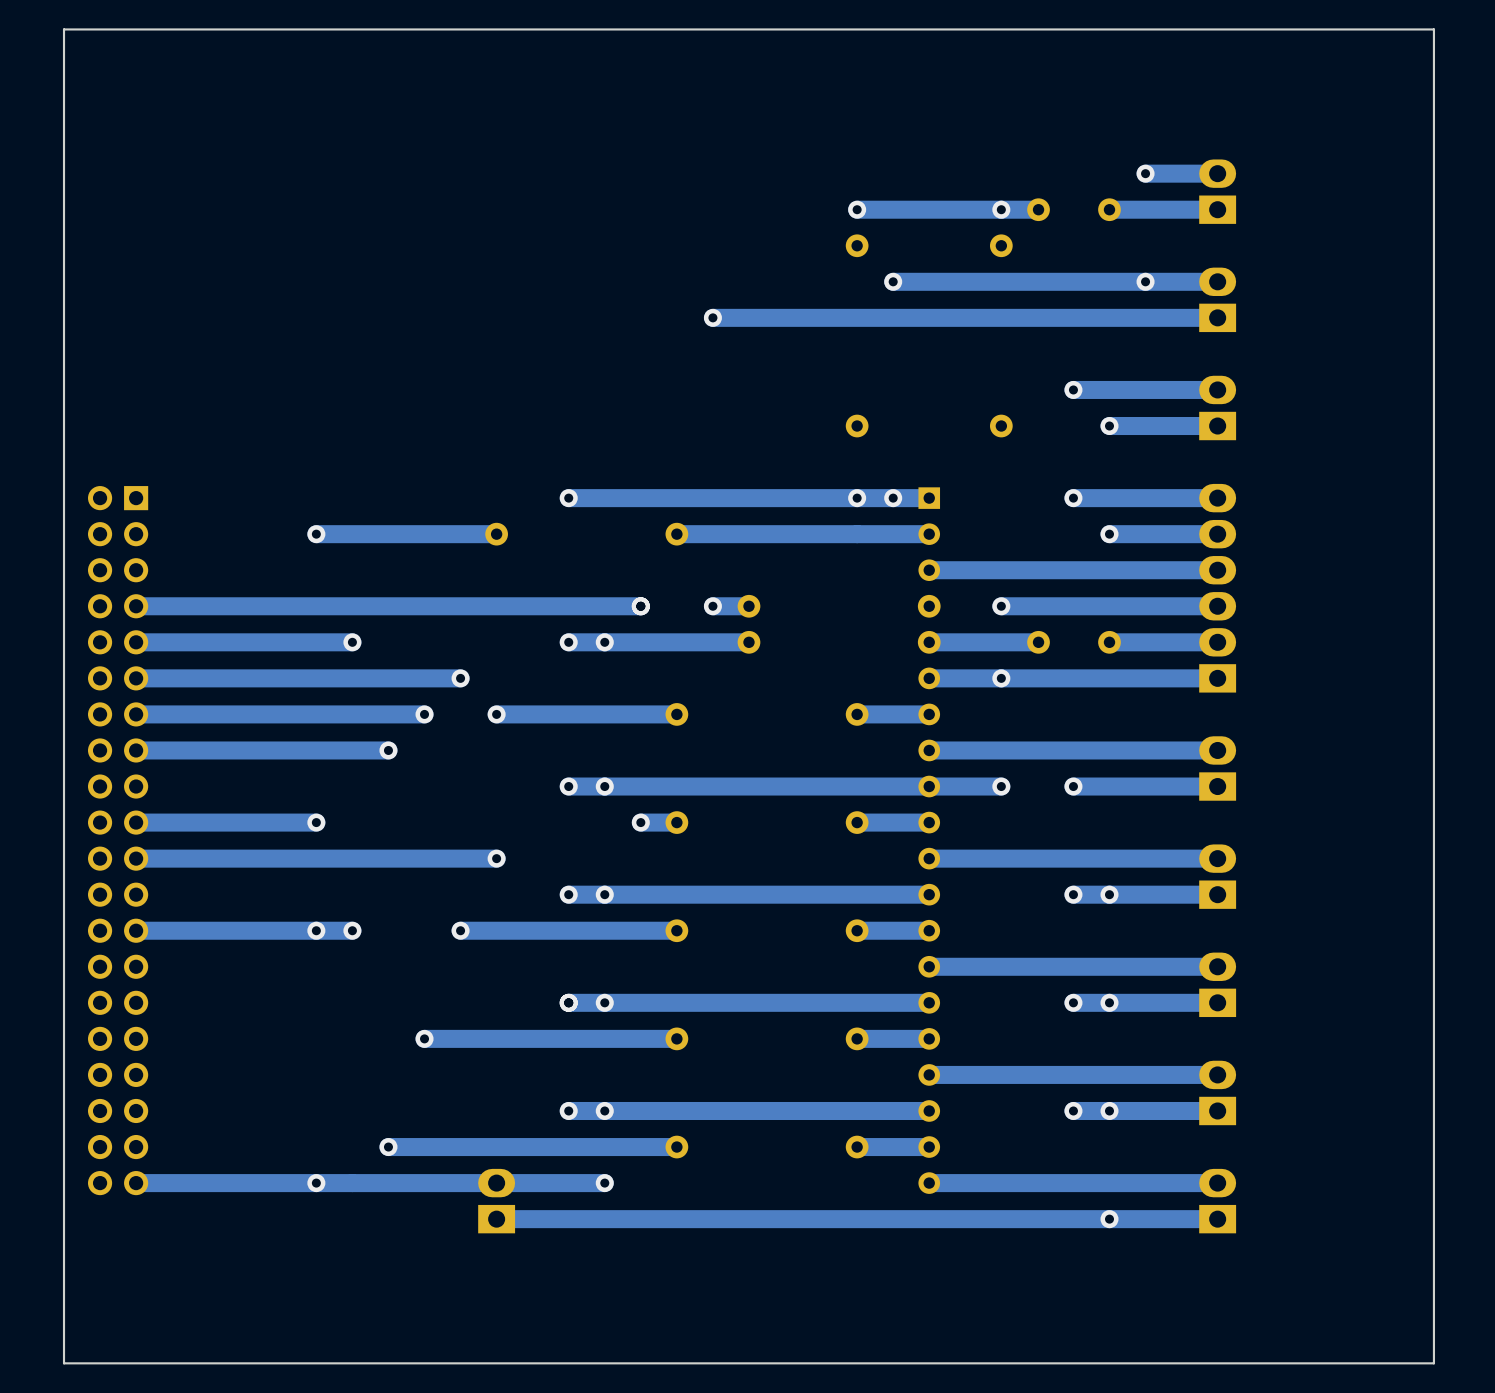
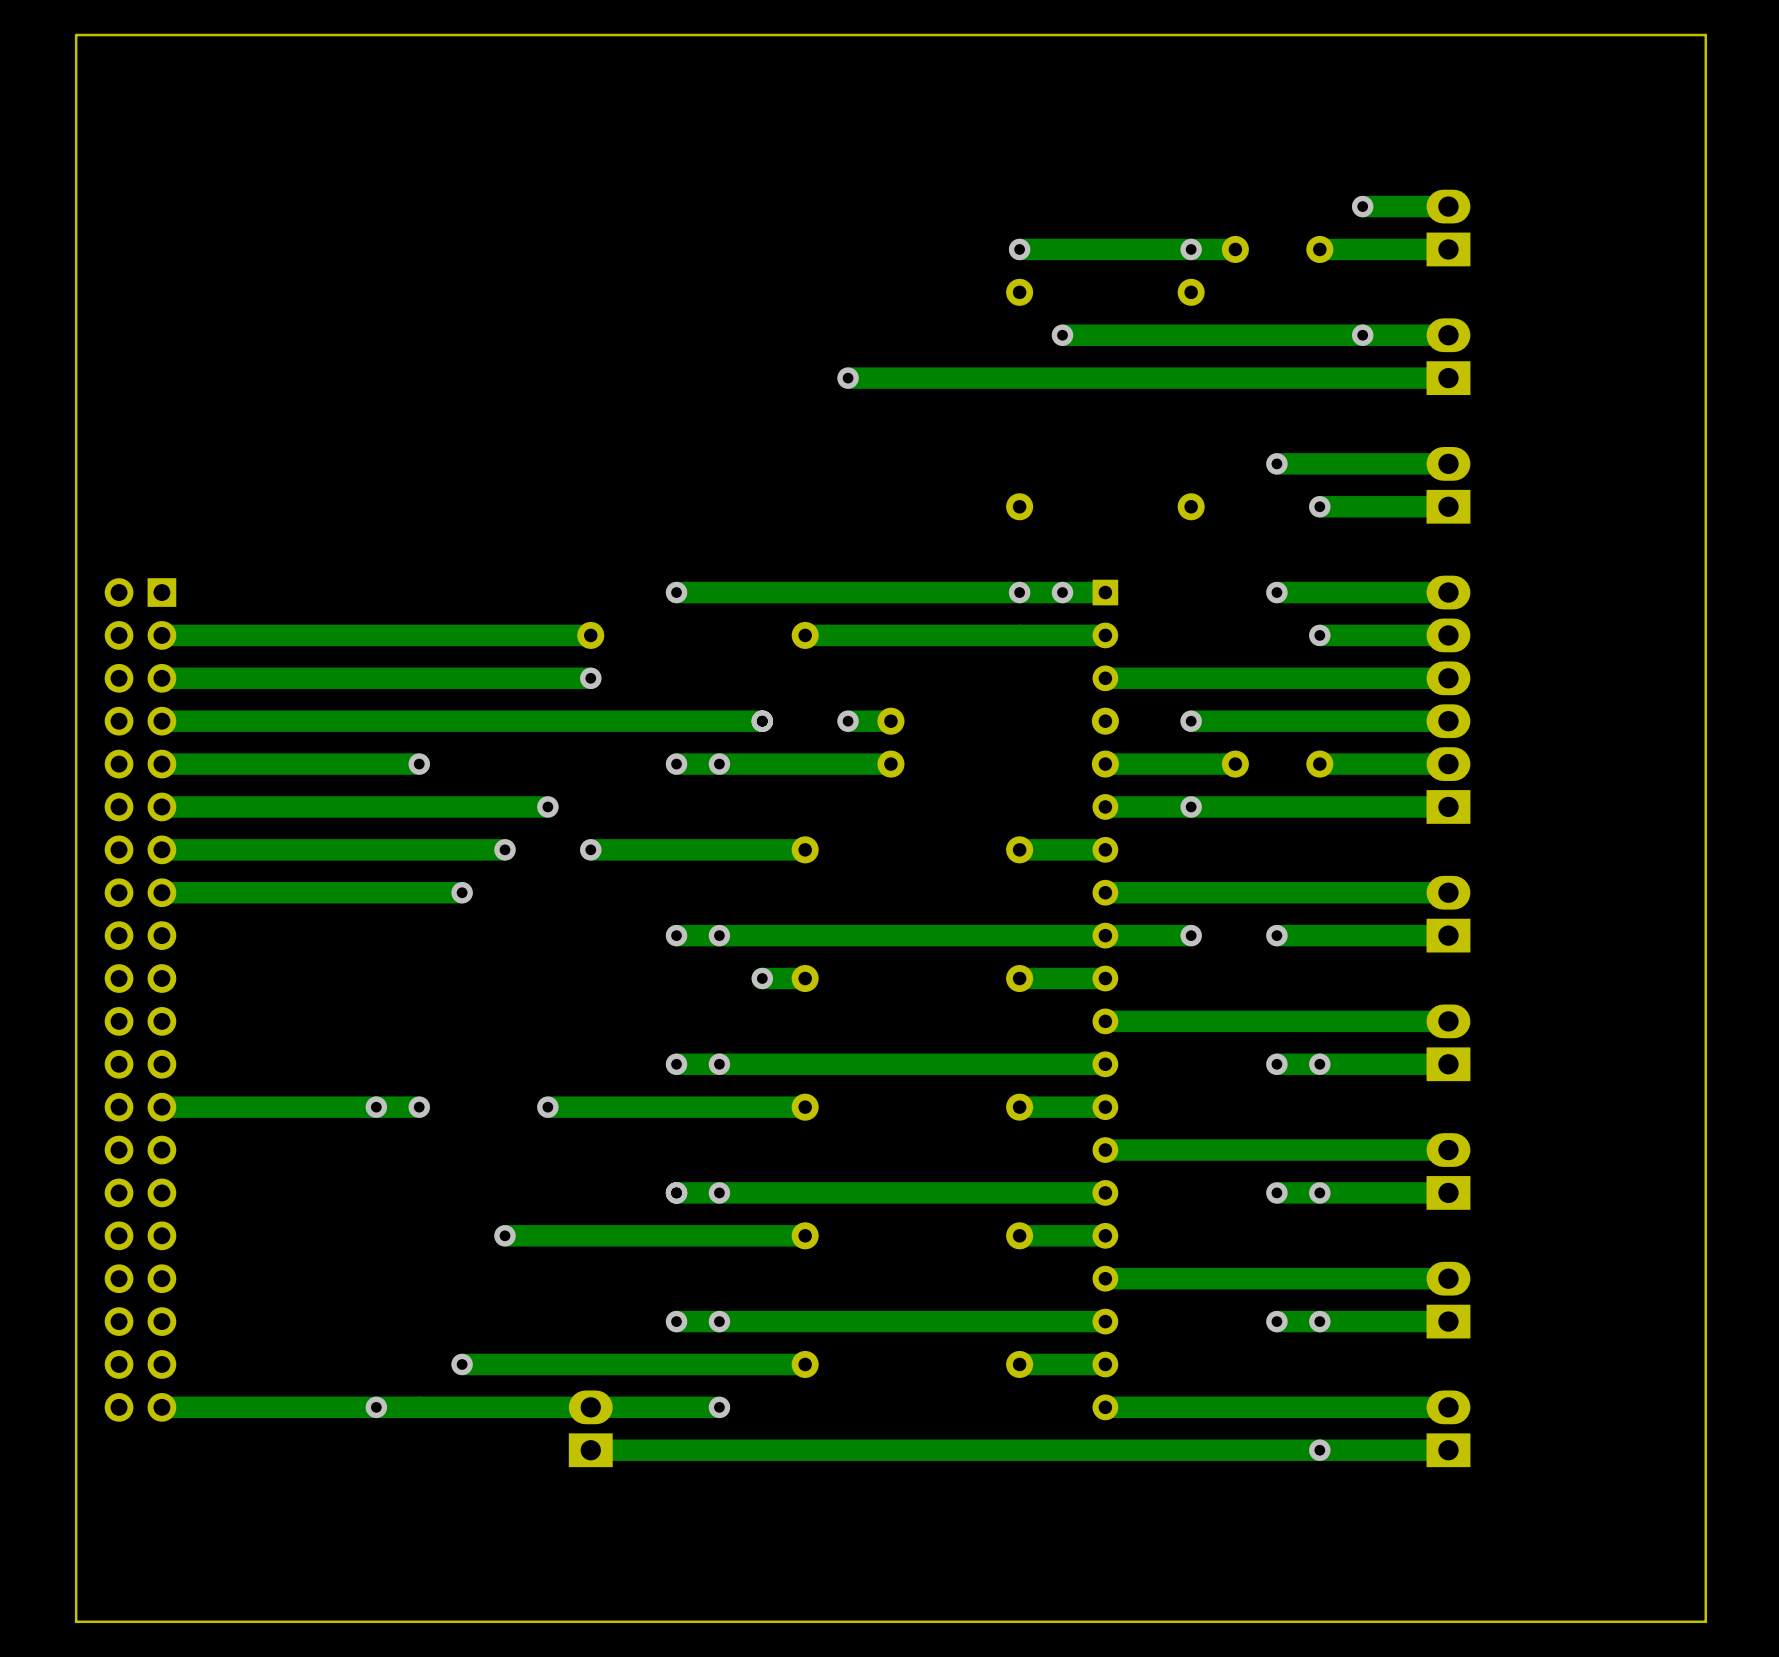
via: (316, 534) -> none
via: none -> (590, 678)
track: (316, 822) (136, 822) -> (376, 635) (161, 635)
via: (316, 822) -> none
track: (496, 858) (136, 858) -> (590, 678) (161, 678)
via: (496, 858) -> none

